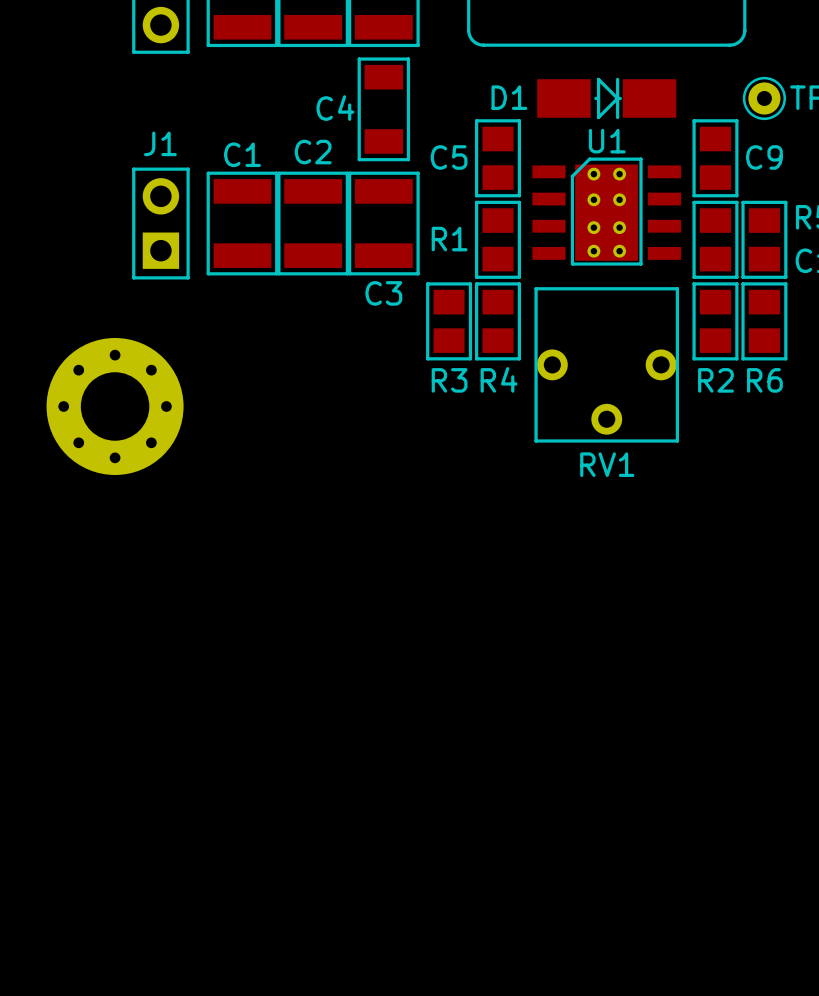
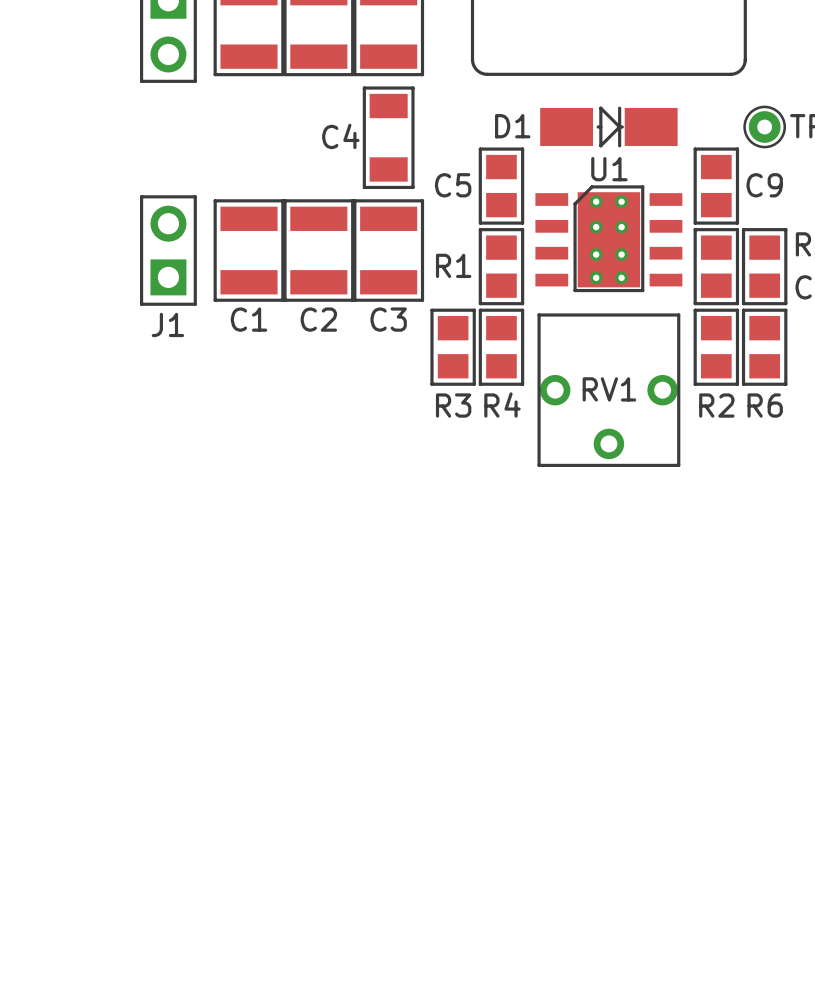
J1 name position: J1 (160, 143) -> J1 (167, 324)
C2 name position: C2 (313, 152) -> C2 (318, 319)
C1 name position: C1 (242, 154) -> C1 (249, 319)
part: (115, 406) -> none
RV1 name position: RV1 (607, 464) -> RV1 (609, 389)

